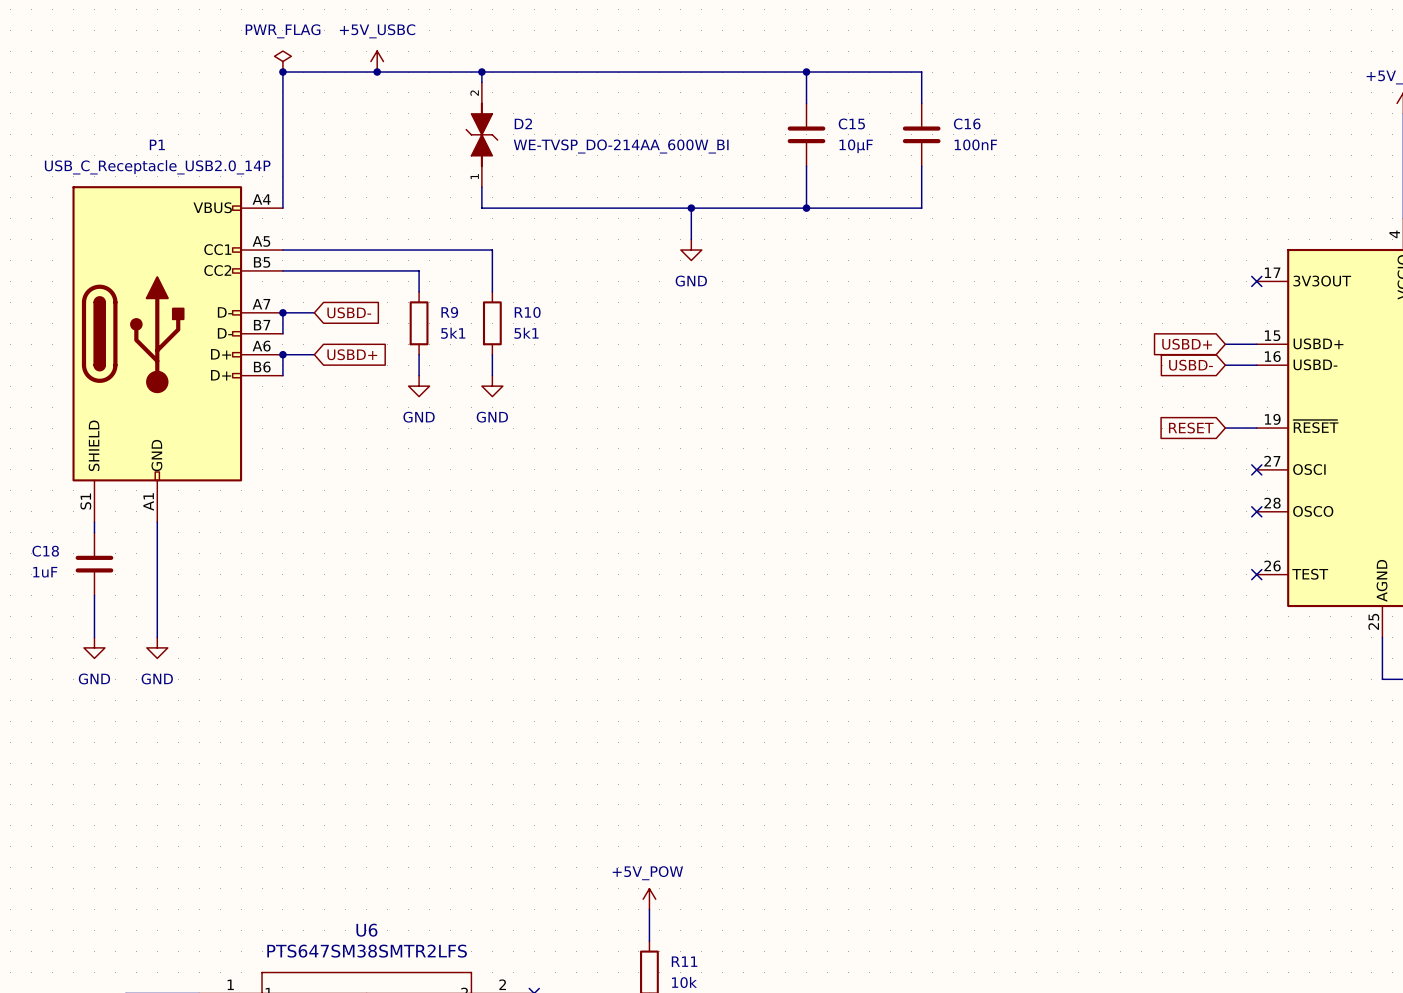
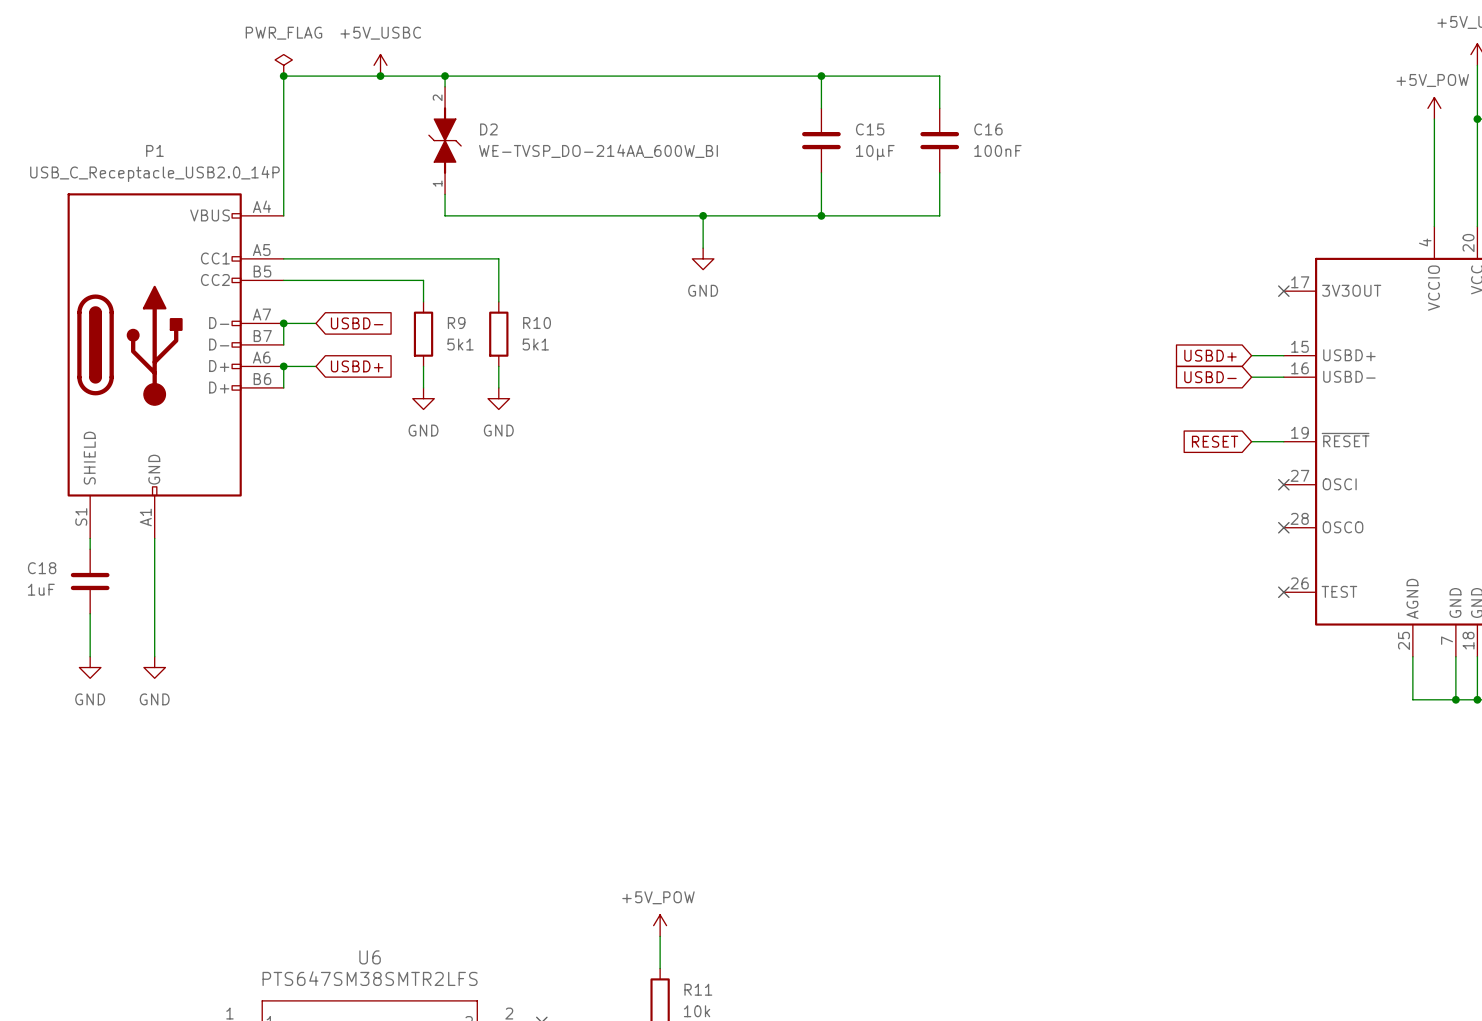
wire: (481, 72) (481, 82) -> (445, 76) (445, 86)
junction position: (481, 72) -> (445, 76)
D2 position: (481, 134) -> (445, 140)
wire: (481, 187) (481, 208) -> (445, 194) (445, 215) (488, 215)

